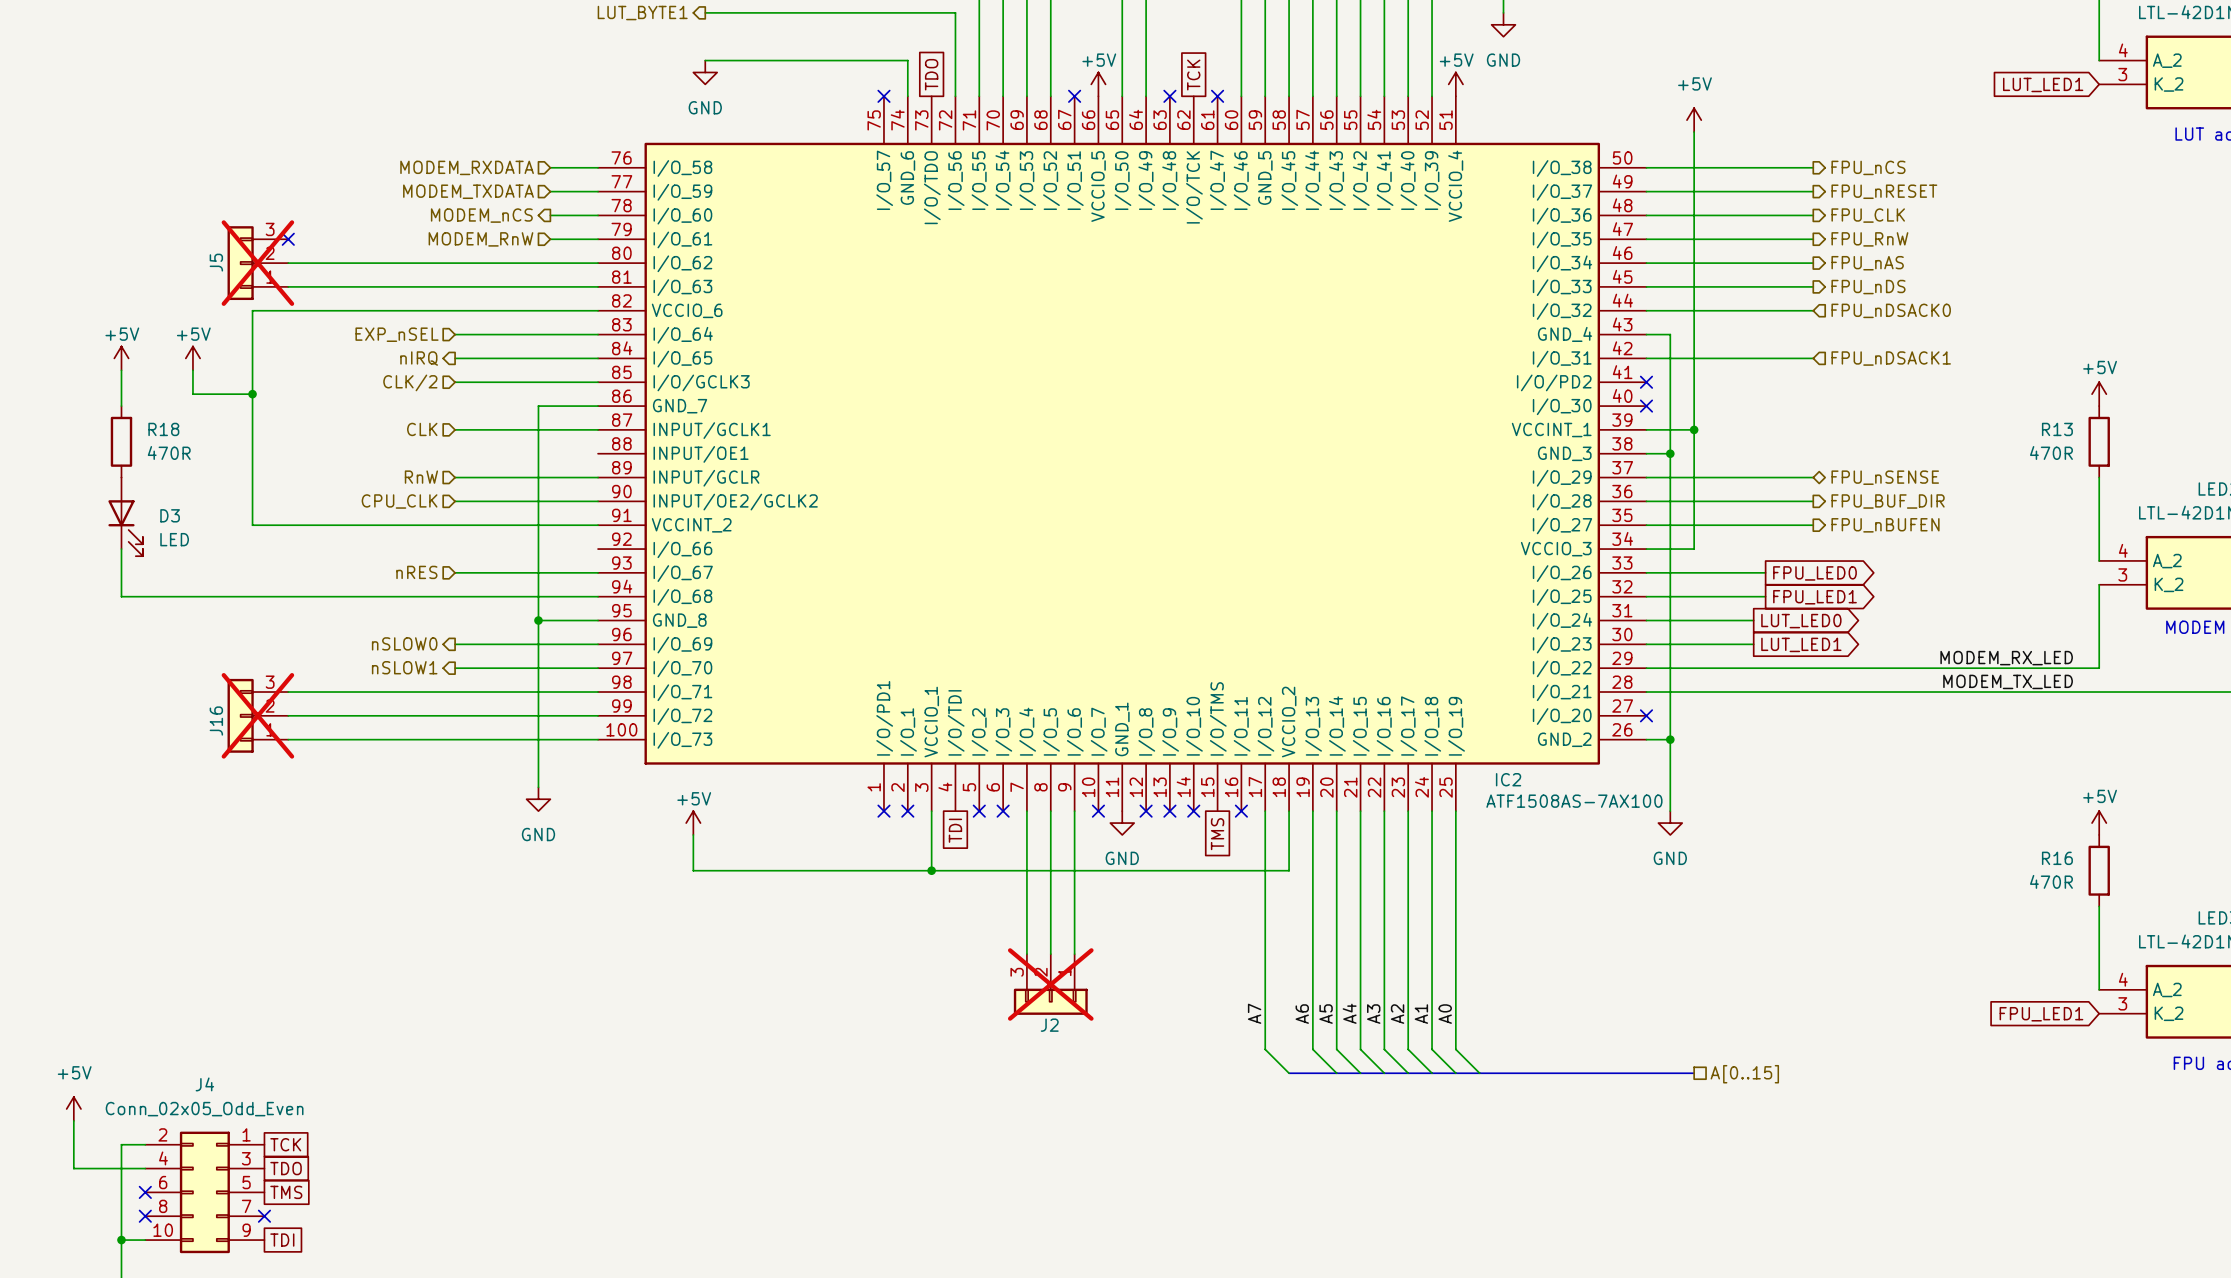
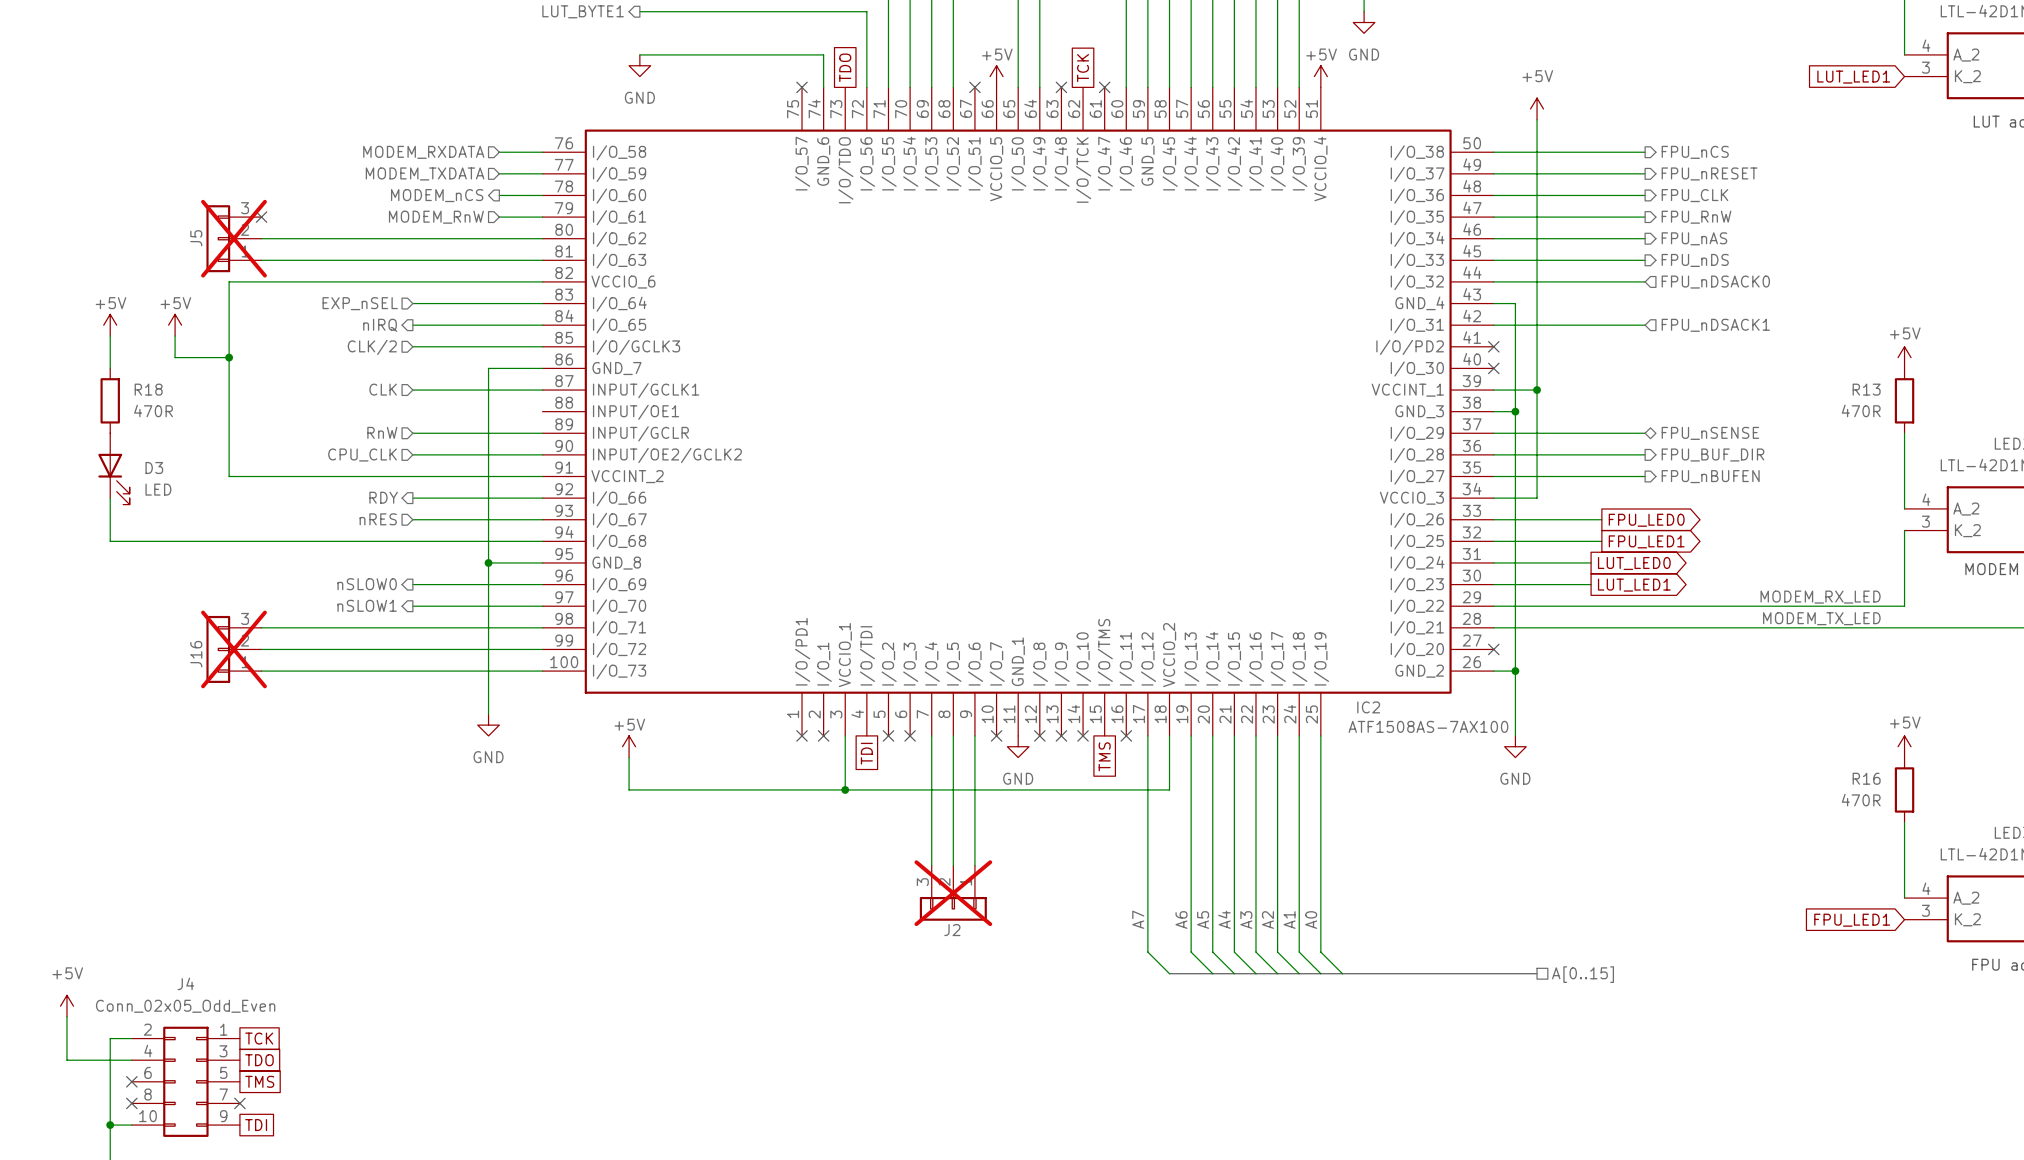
hierarchical label: none -> RDY (383, 497)
wire: none -> (412, 498) (542, 498)

